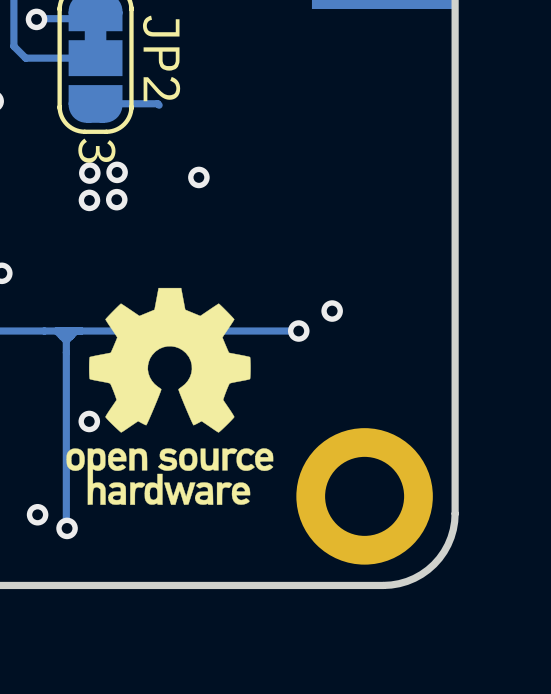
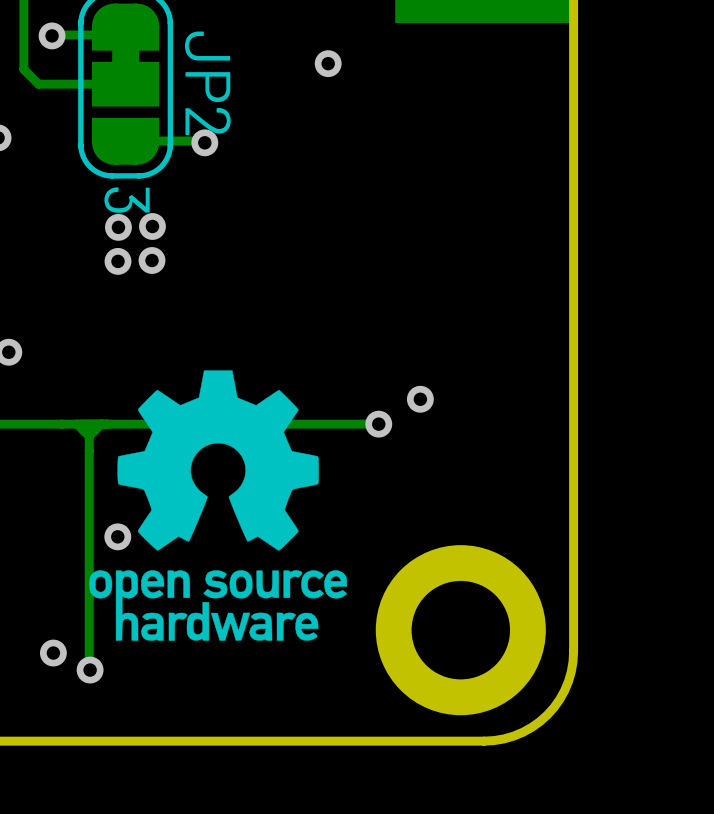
via: none -> (328, 63)
via: none -> (204, 142)
via: (198, 177) -> none

